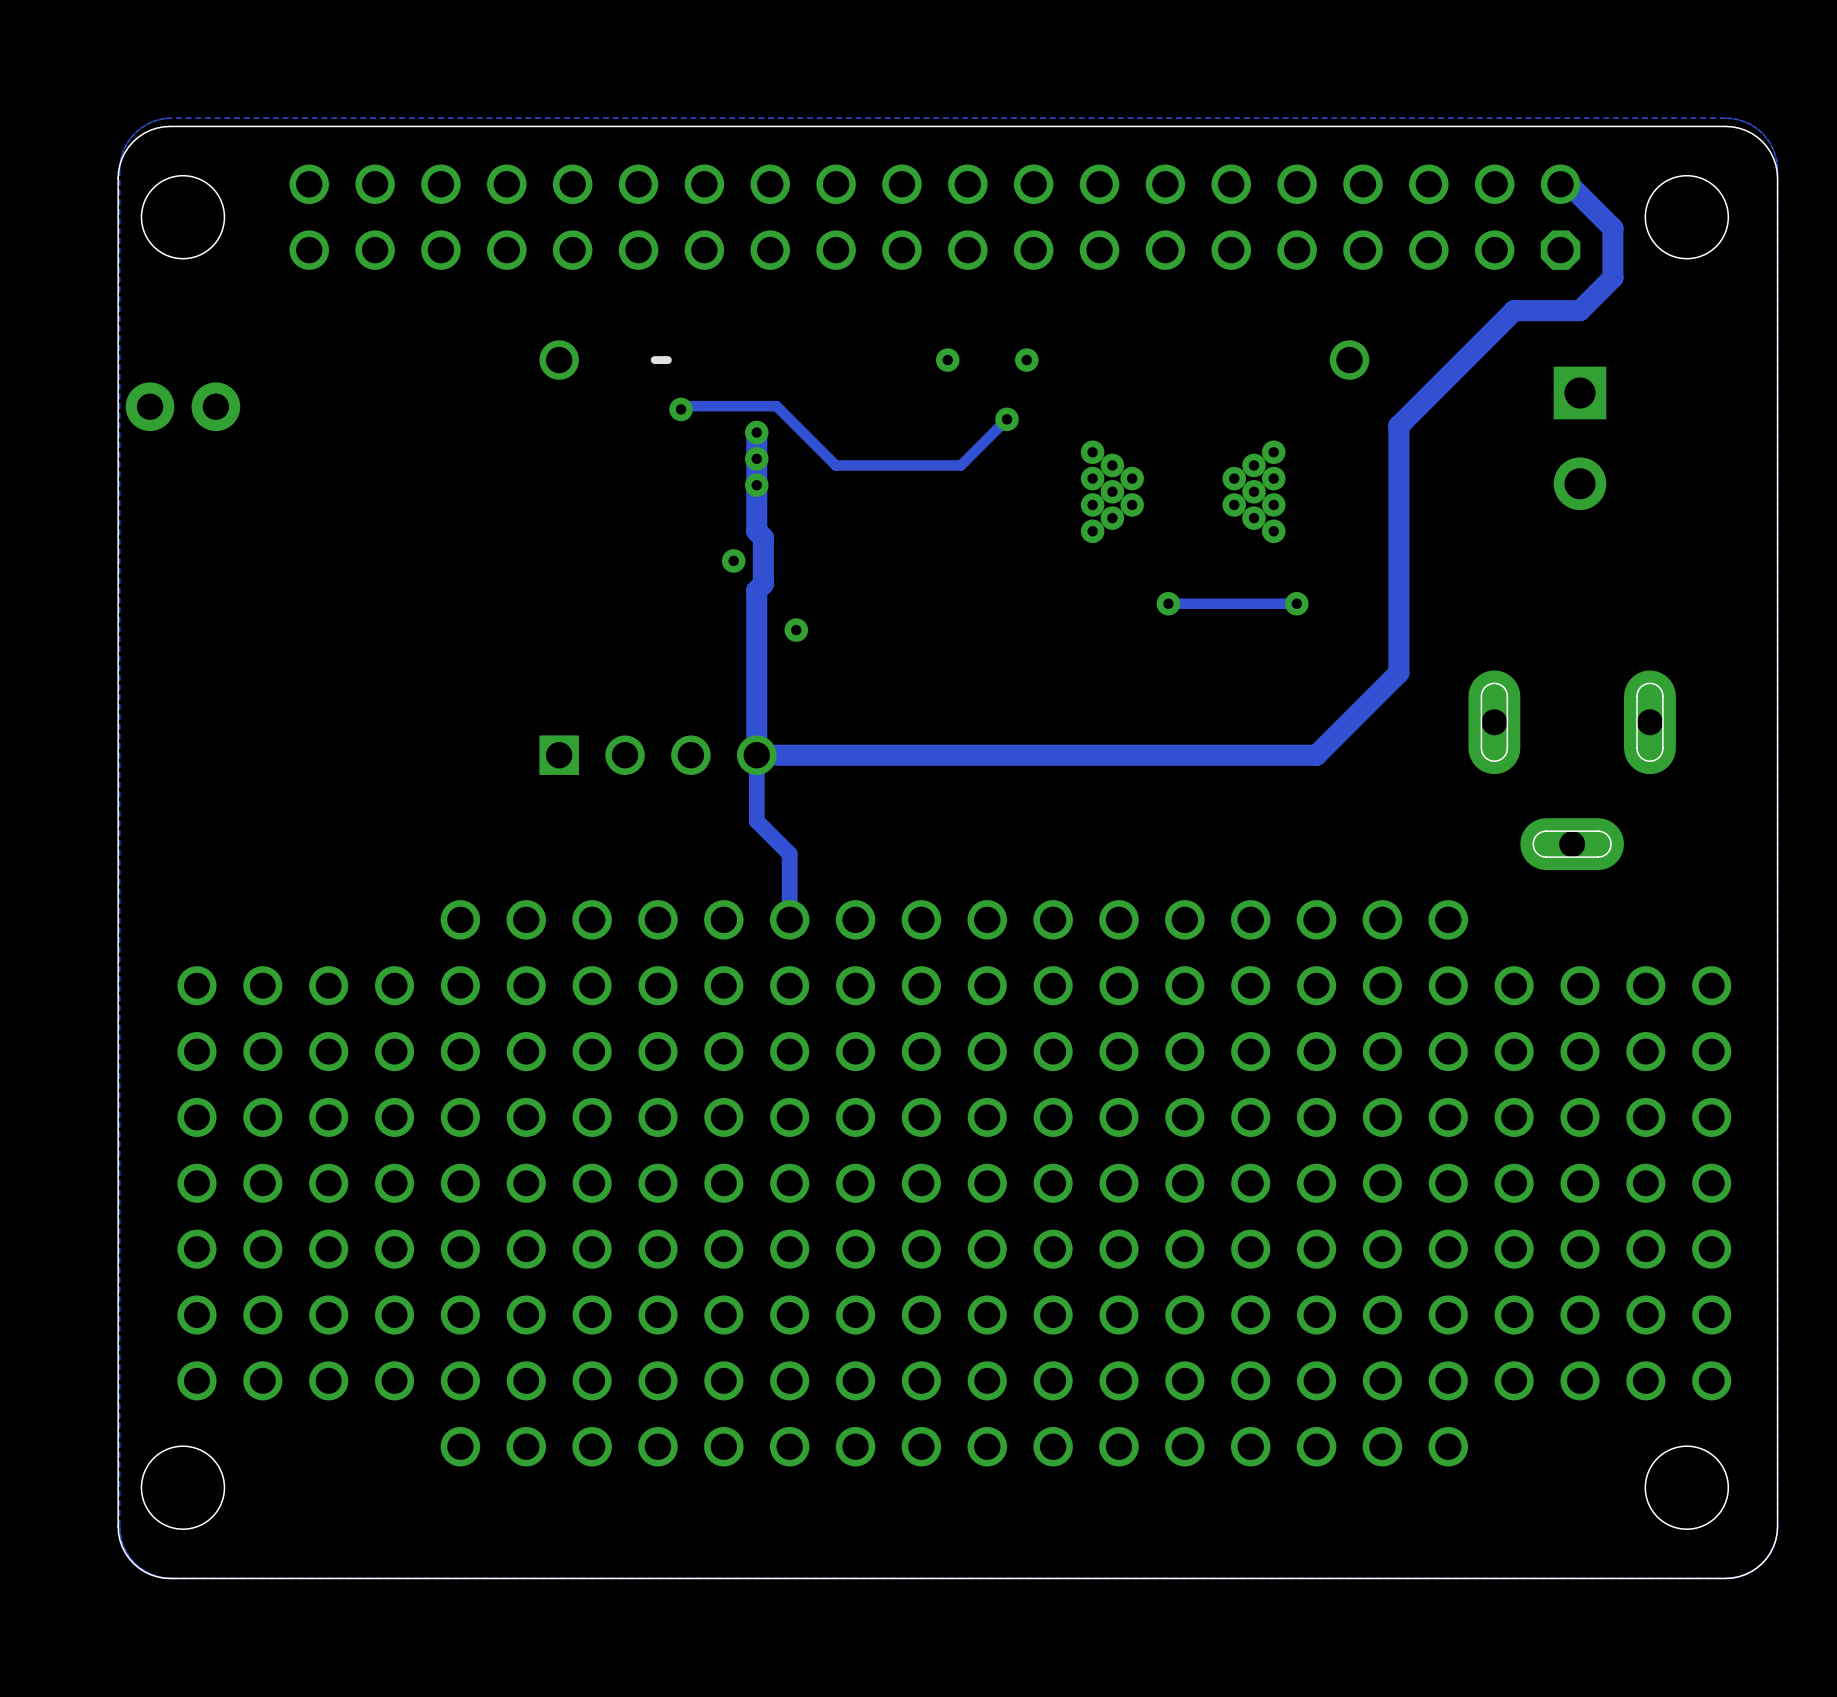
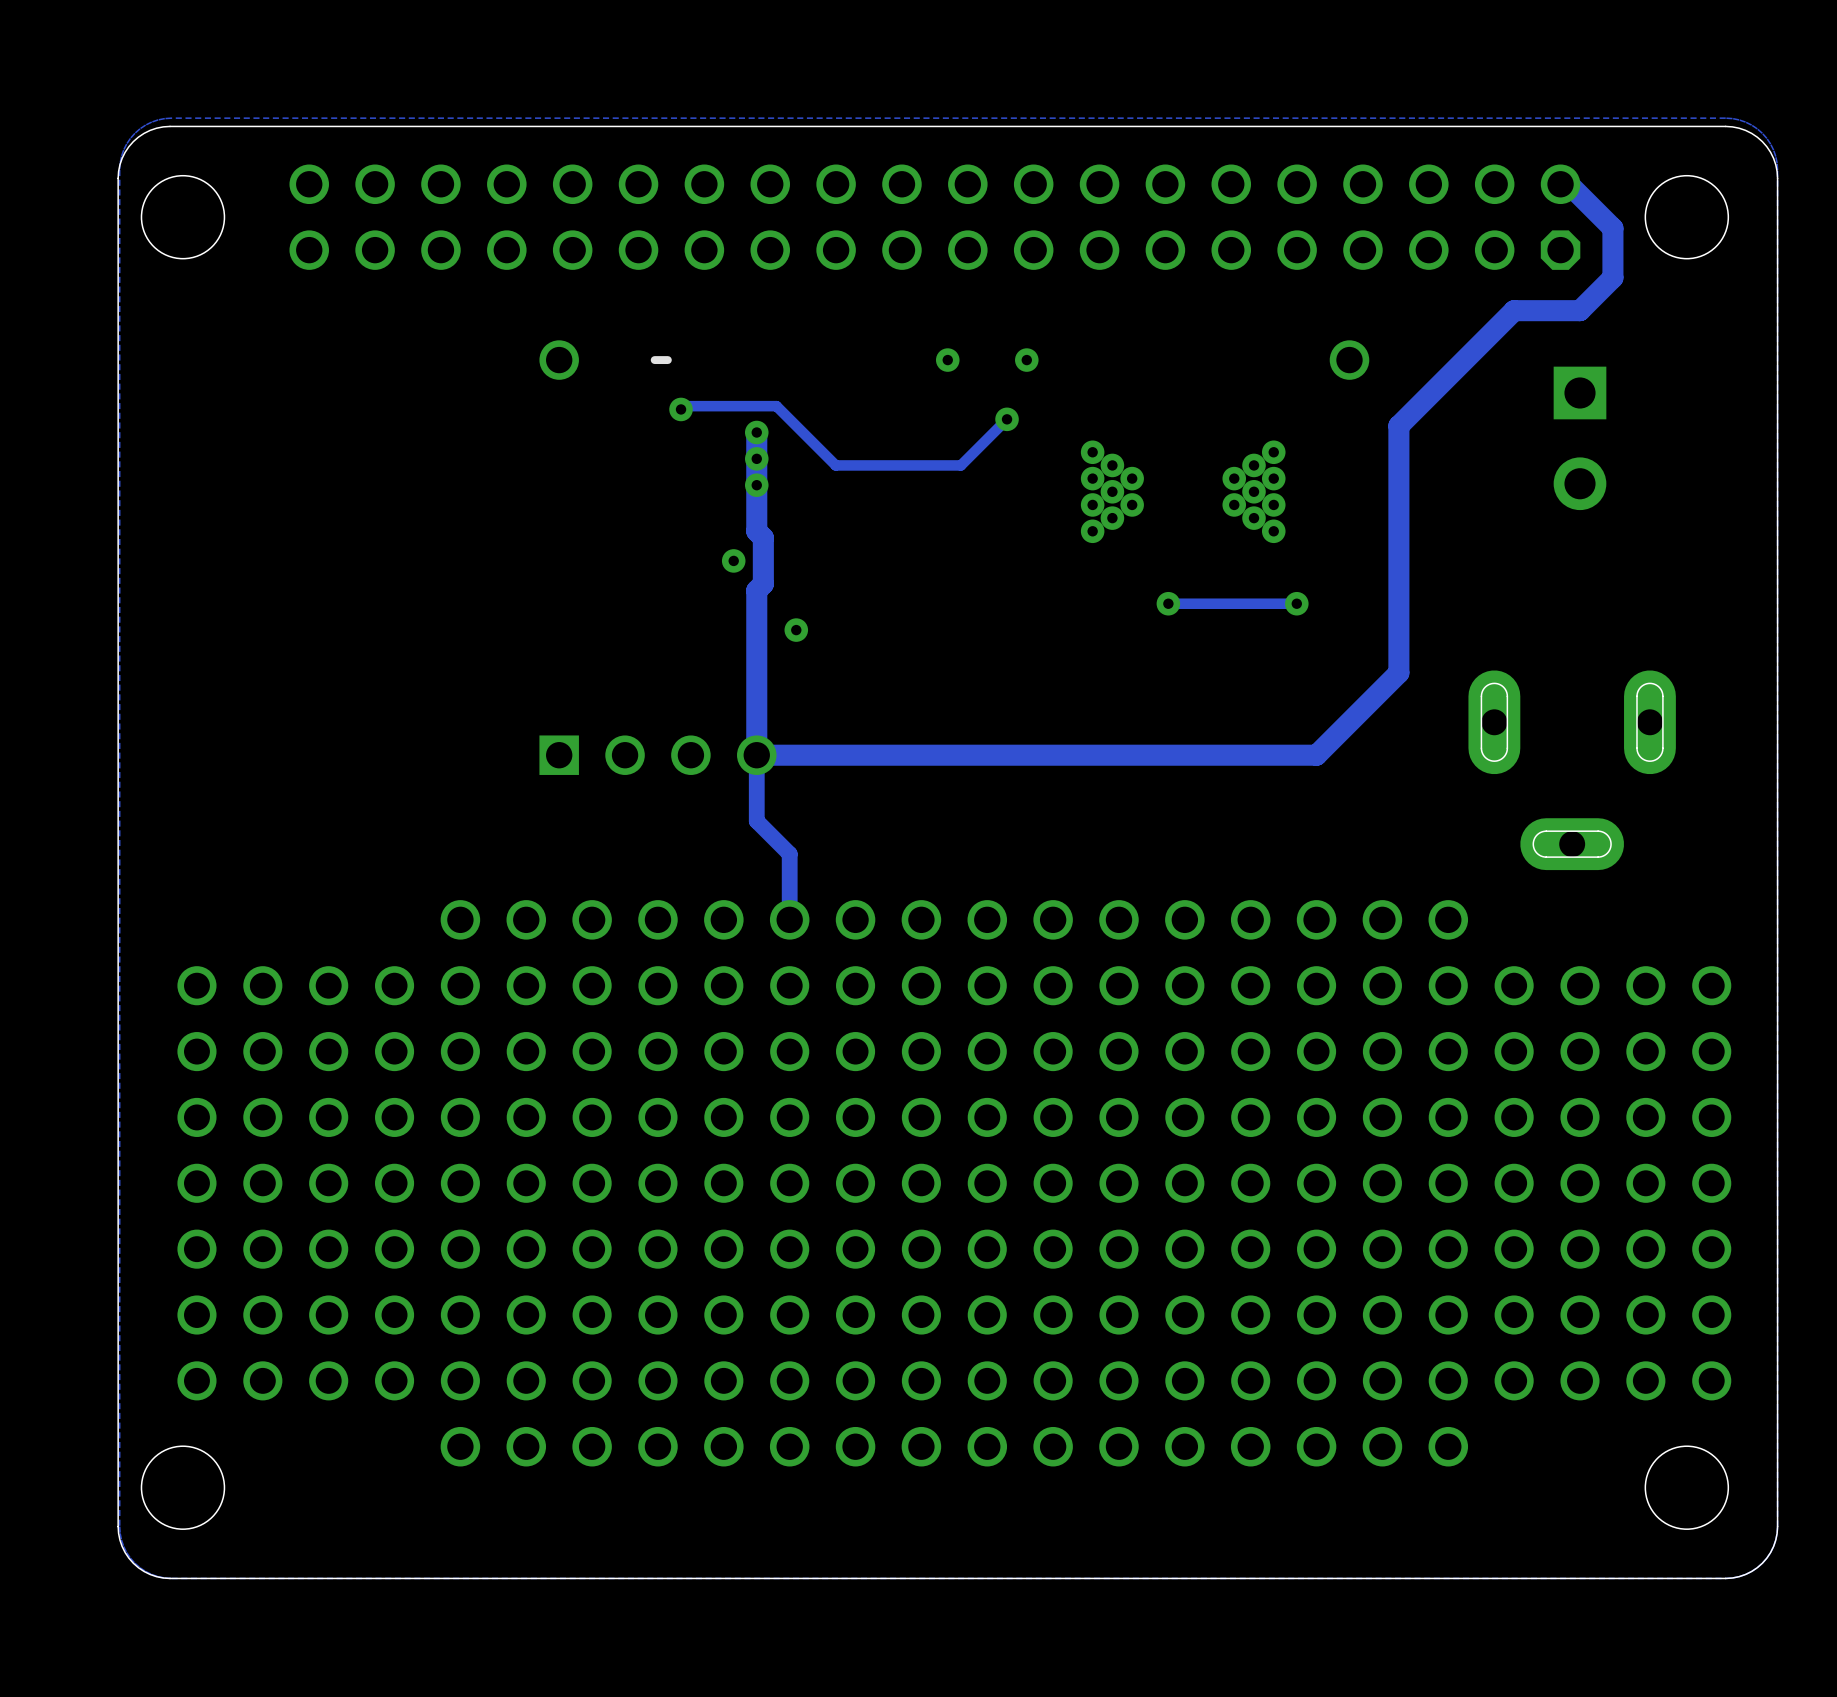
part: (182, 406) -> none

